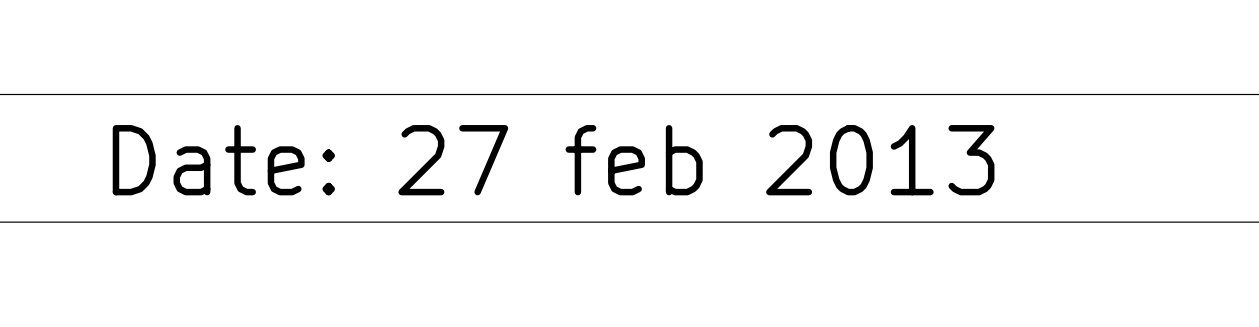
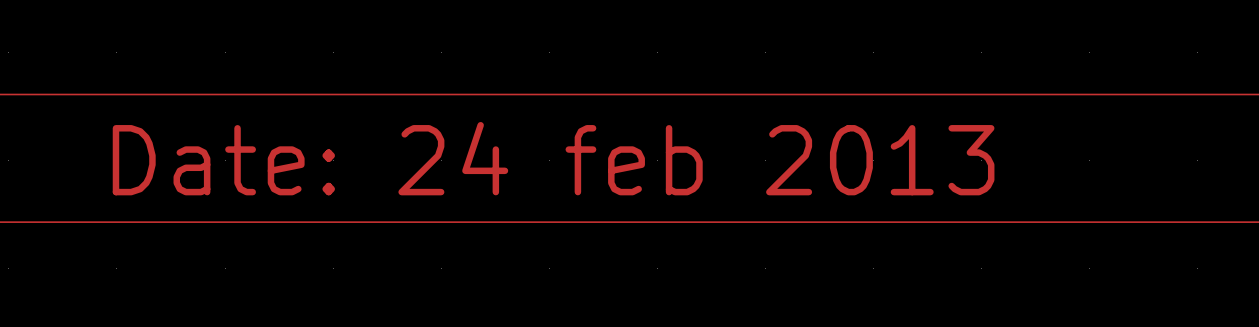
title block: Date: 27 feb 2013 (553, 160) -> Date: 24 feb 2013 (553, 158)

